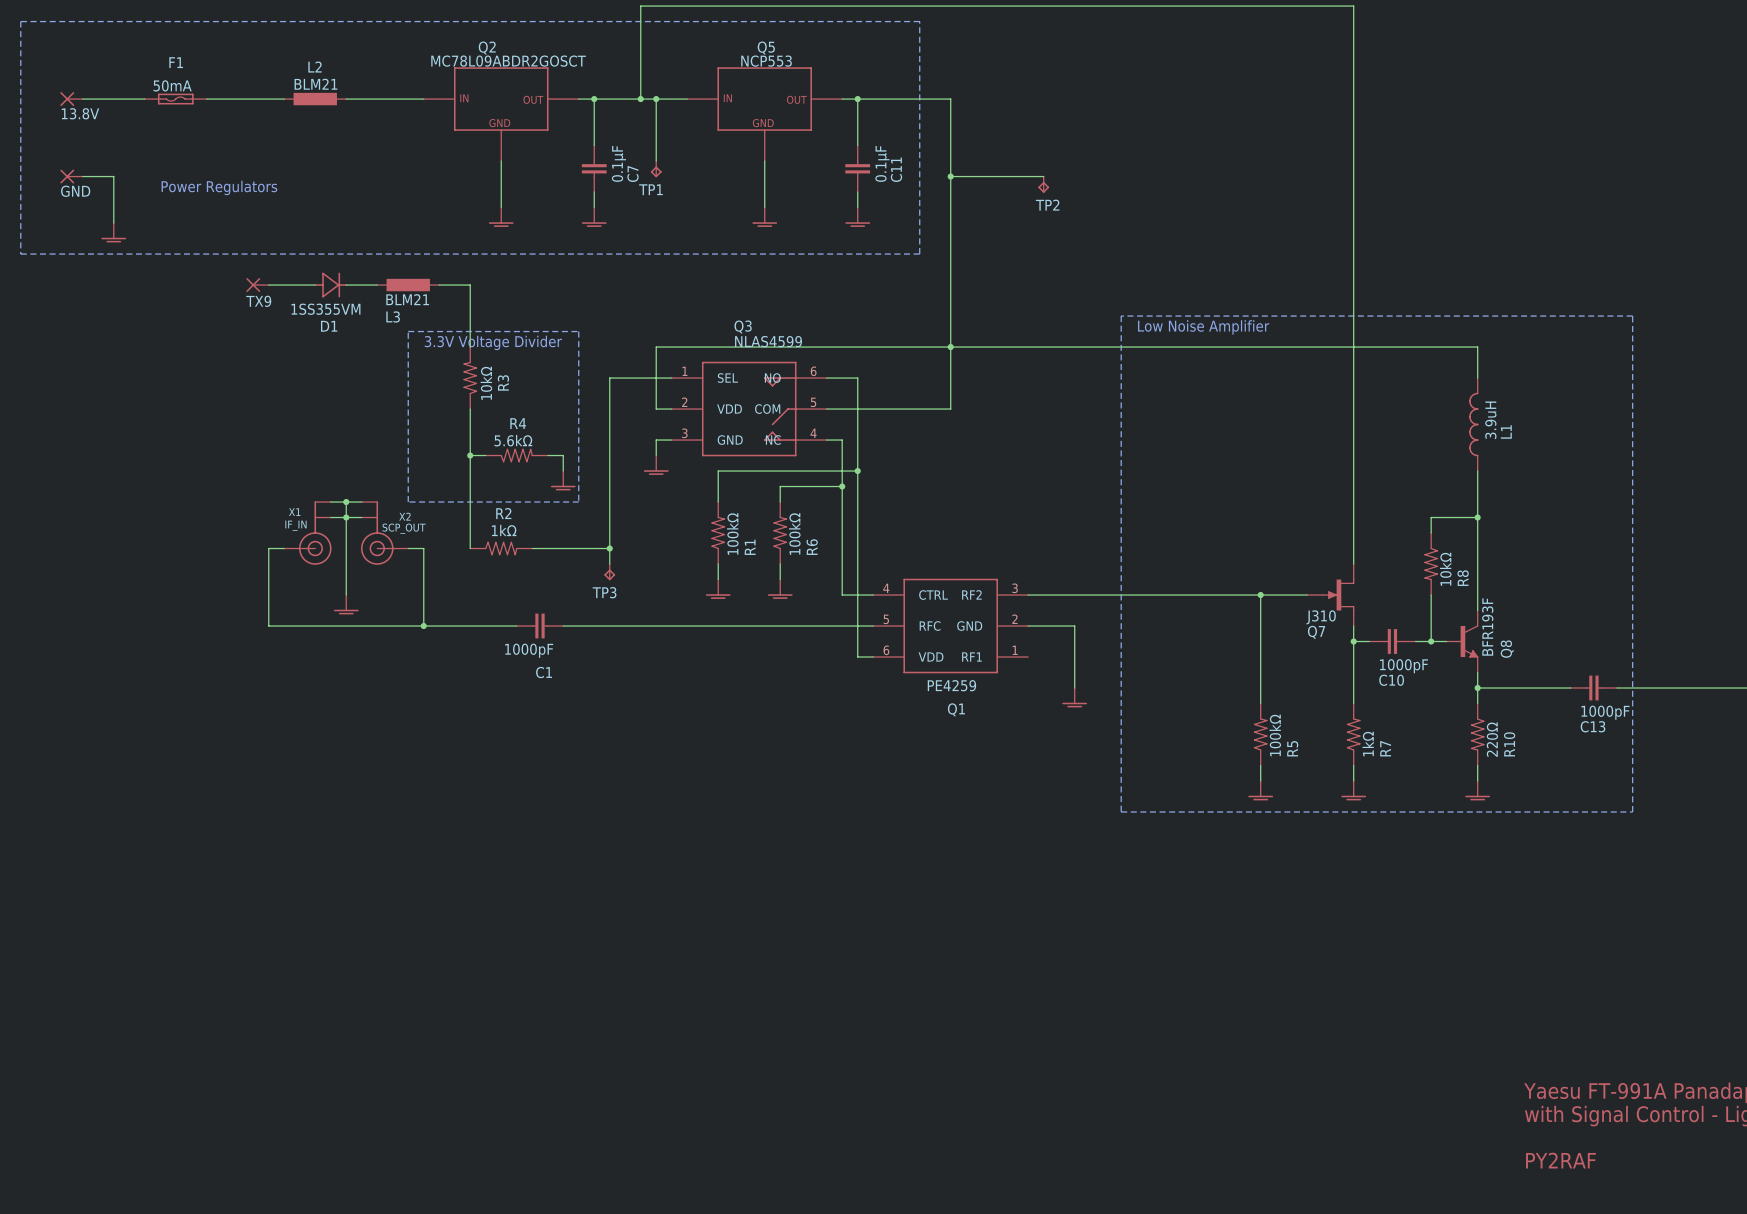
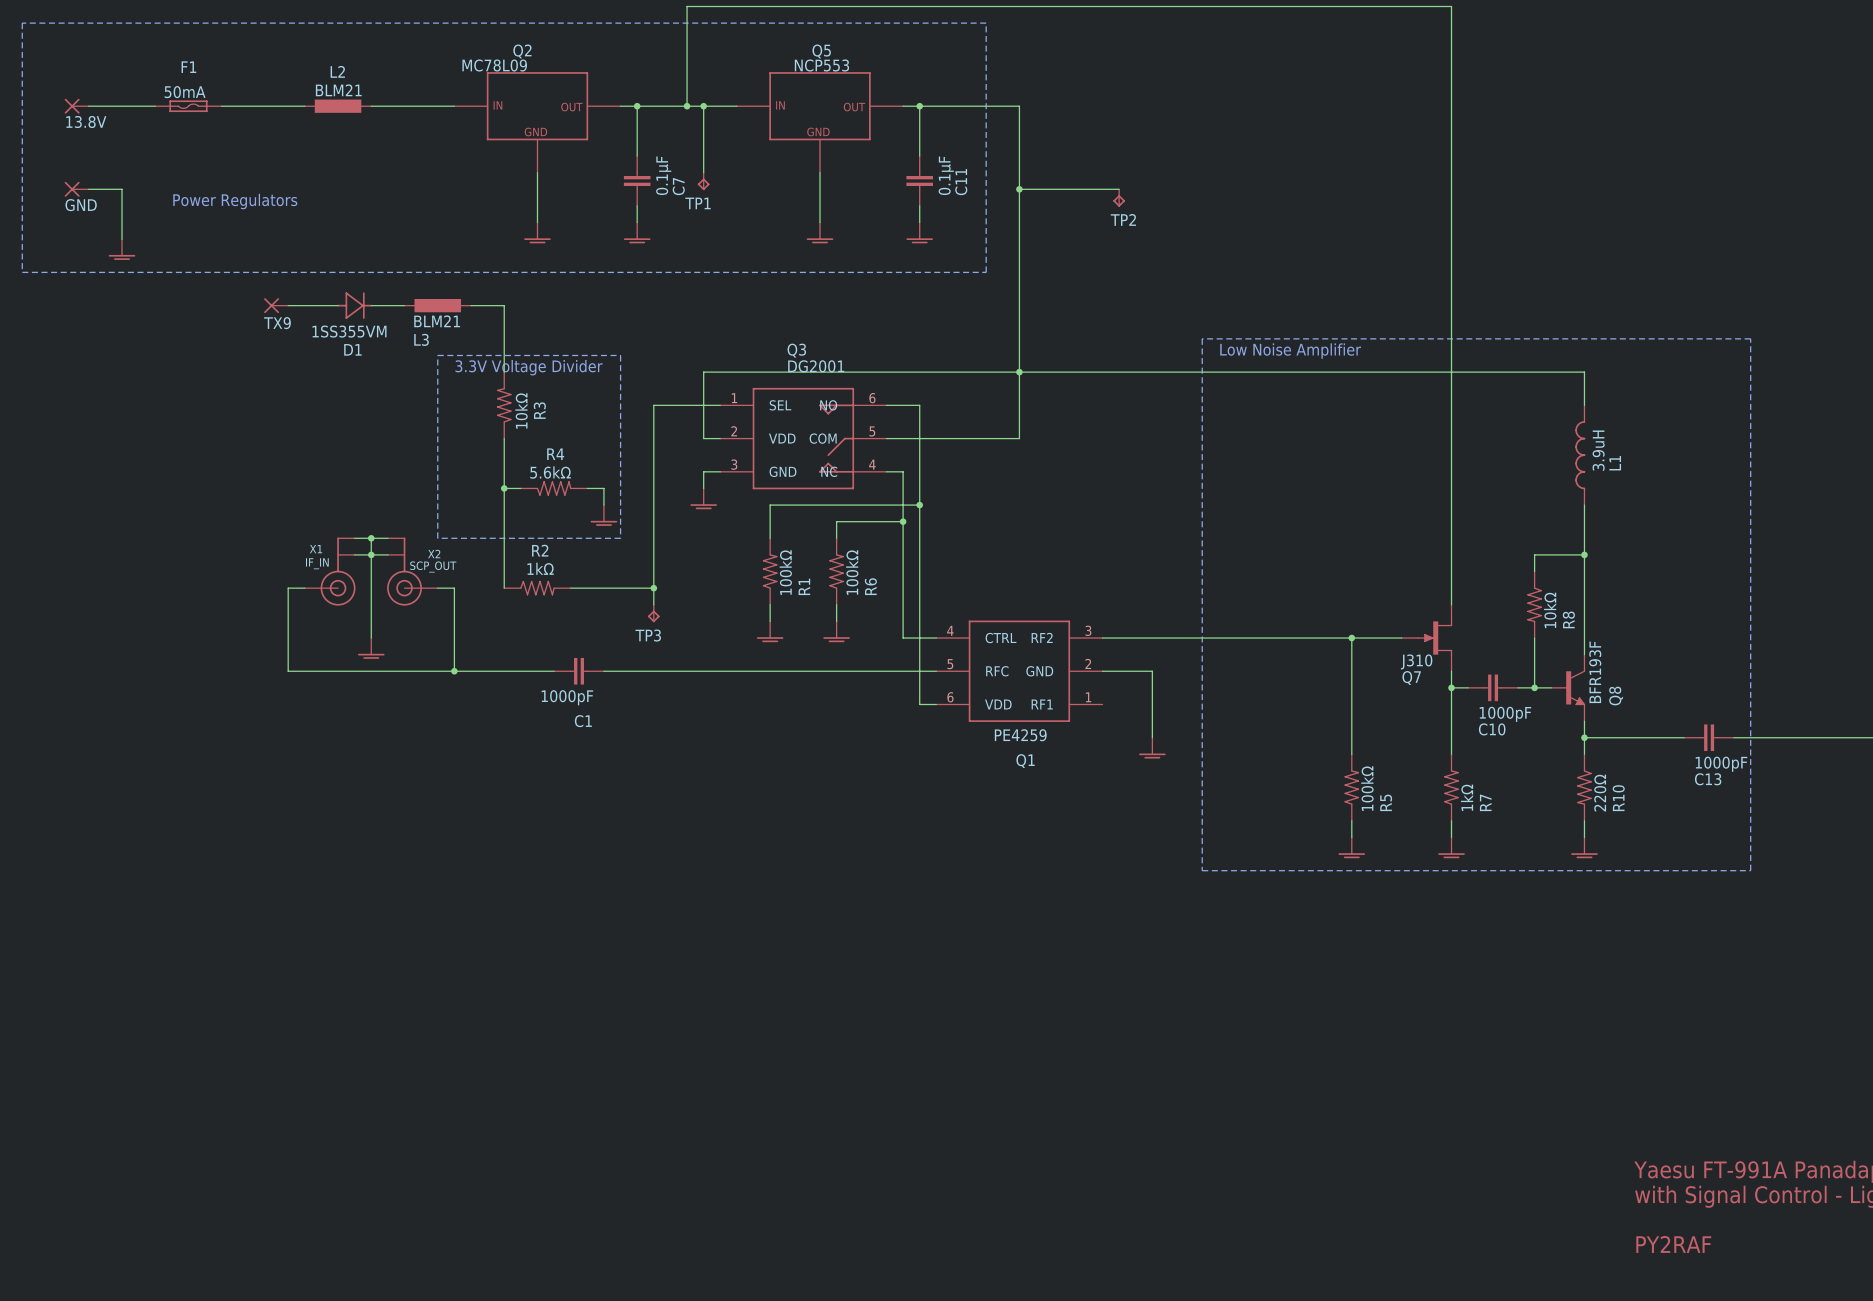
Q2 value: MC78L09ABDR2GOSCT (508, 61) -> MC78L09 (494, 65)
Q3 value: NLAS4599 (768, 341) -> DG2001 (816, 366)

